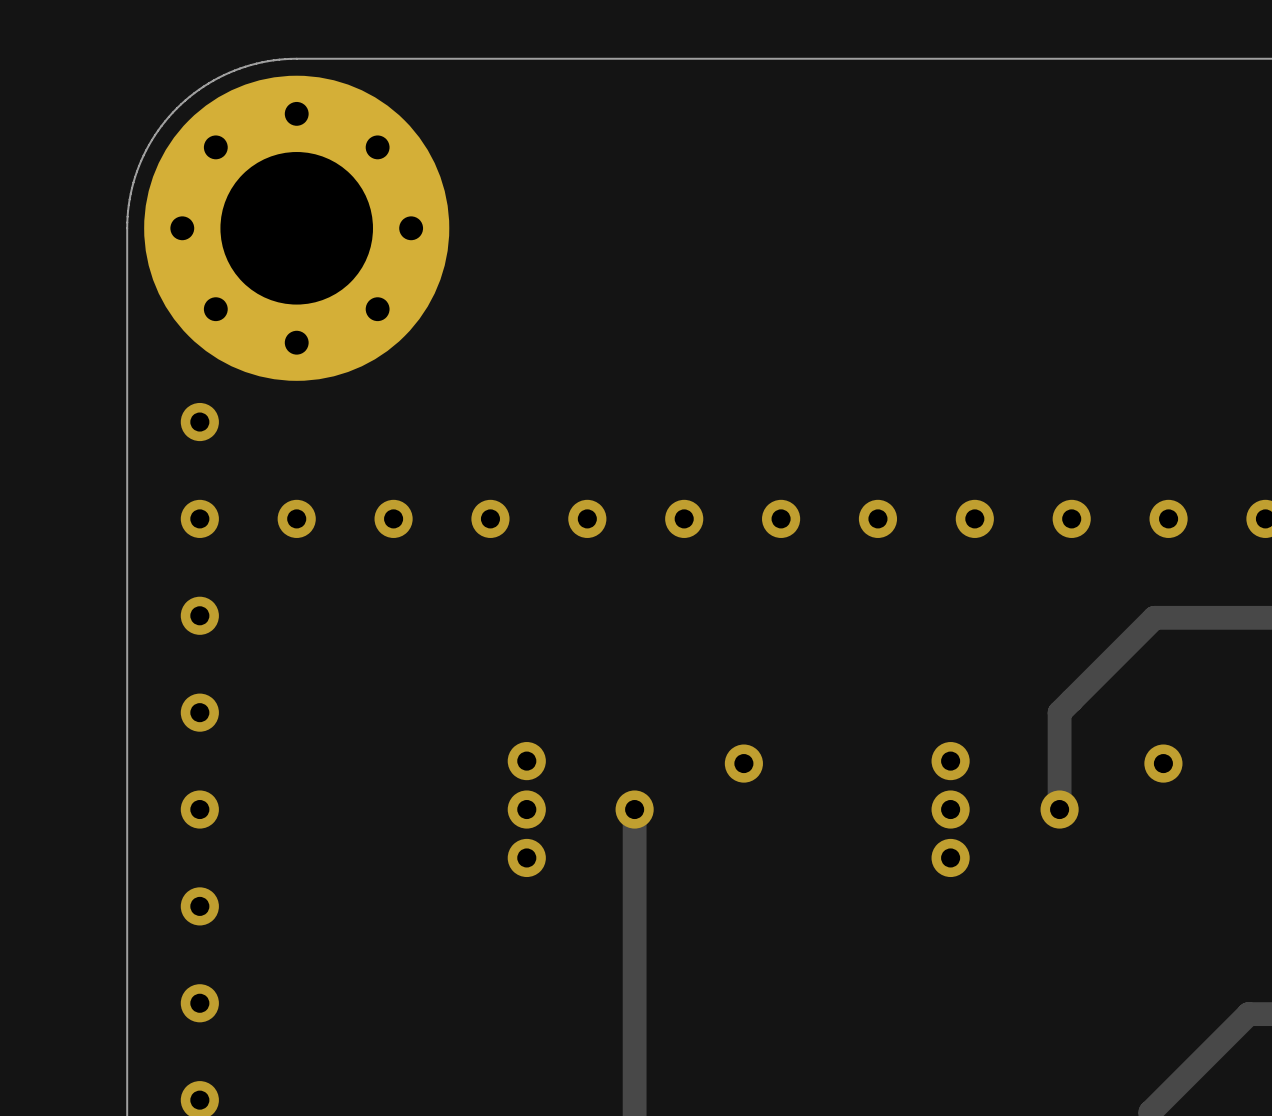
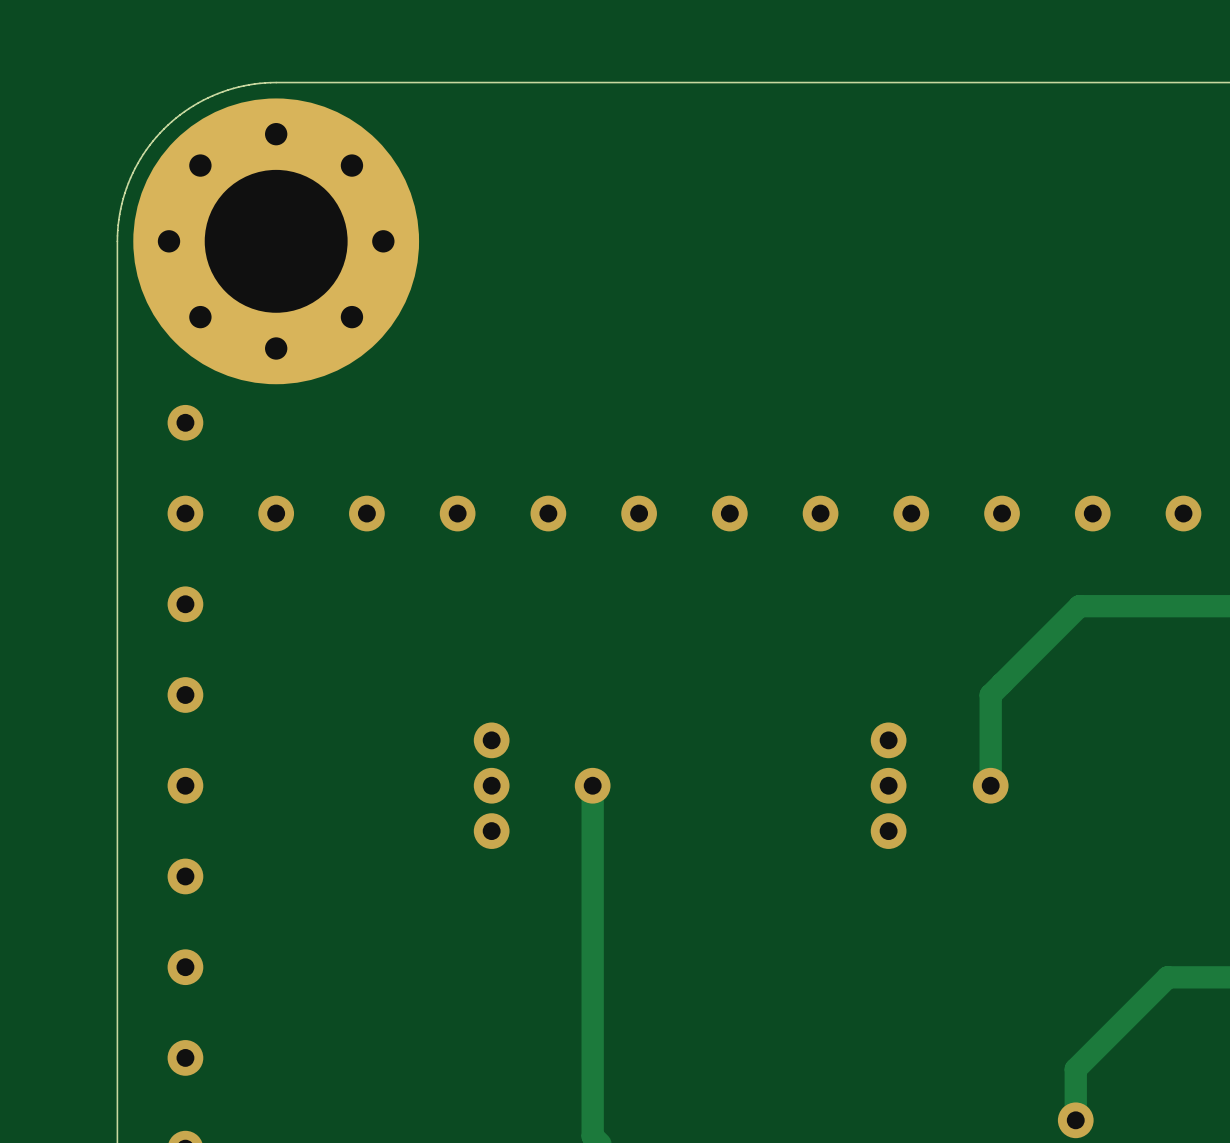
via: (743, 763) -> none
via: (1163, 763) -> none

